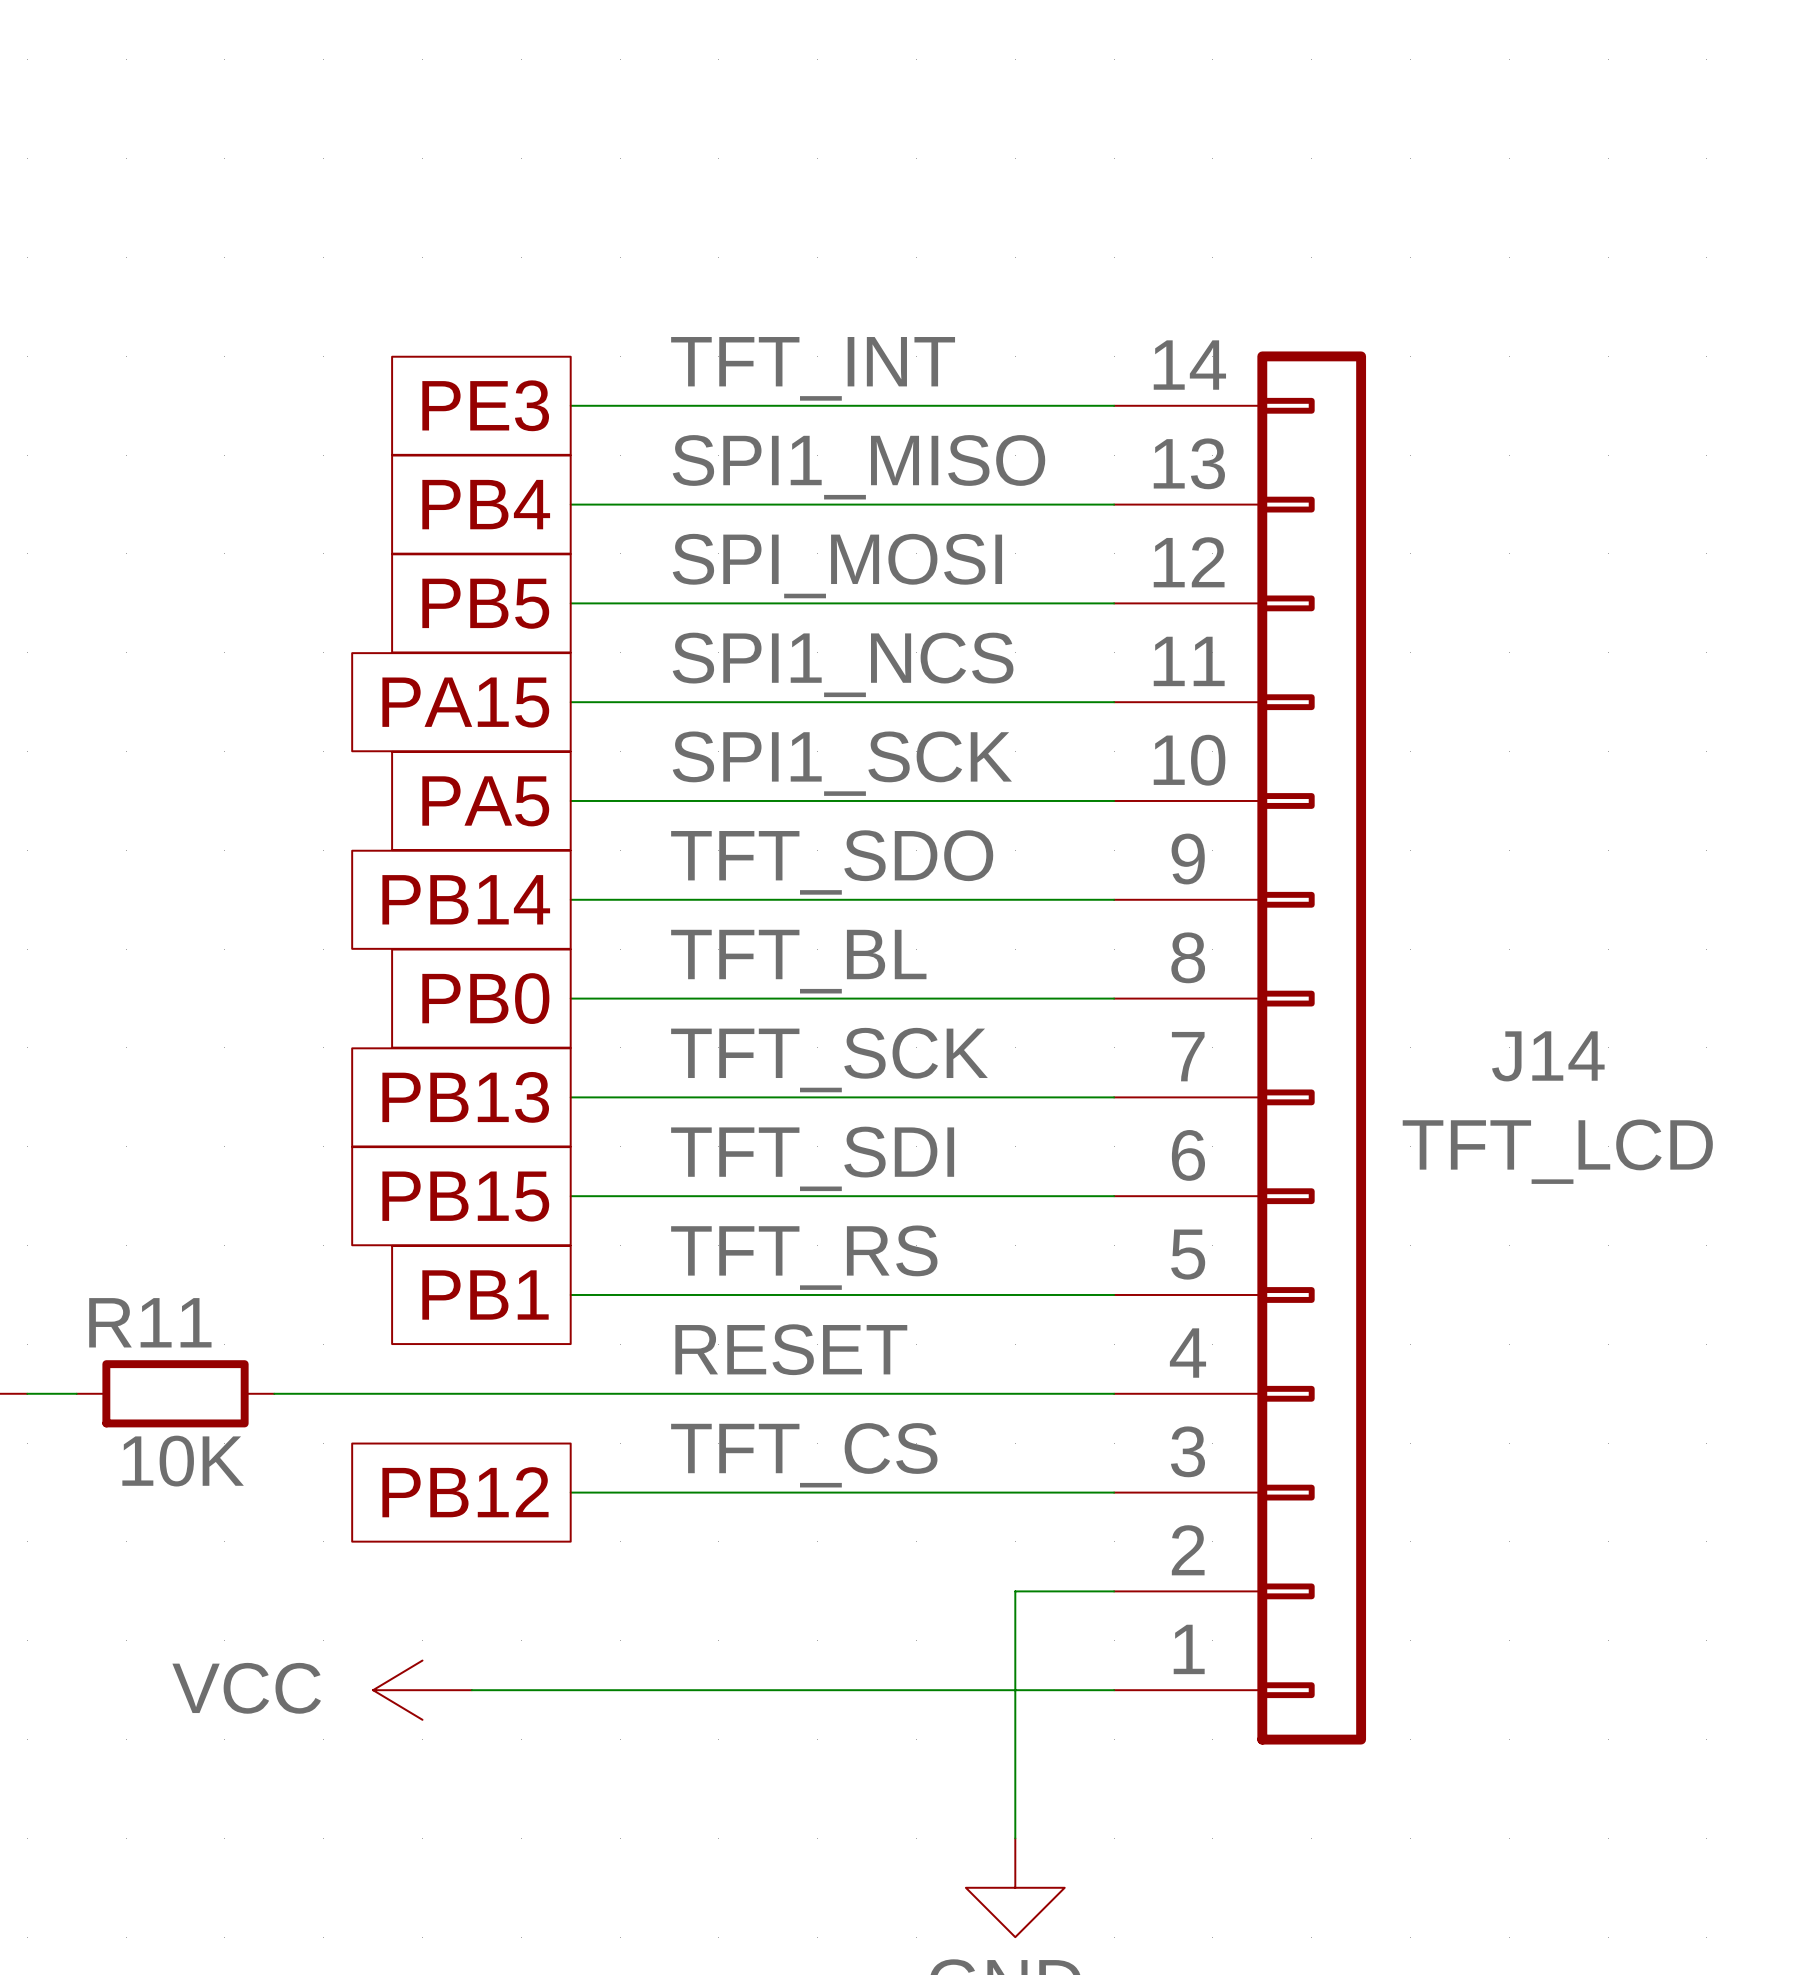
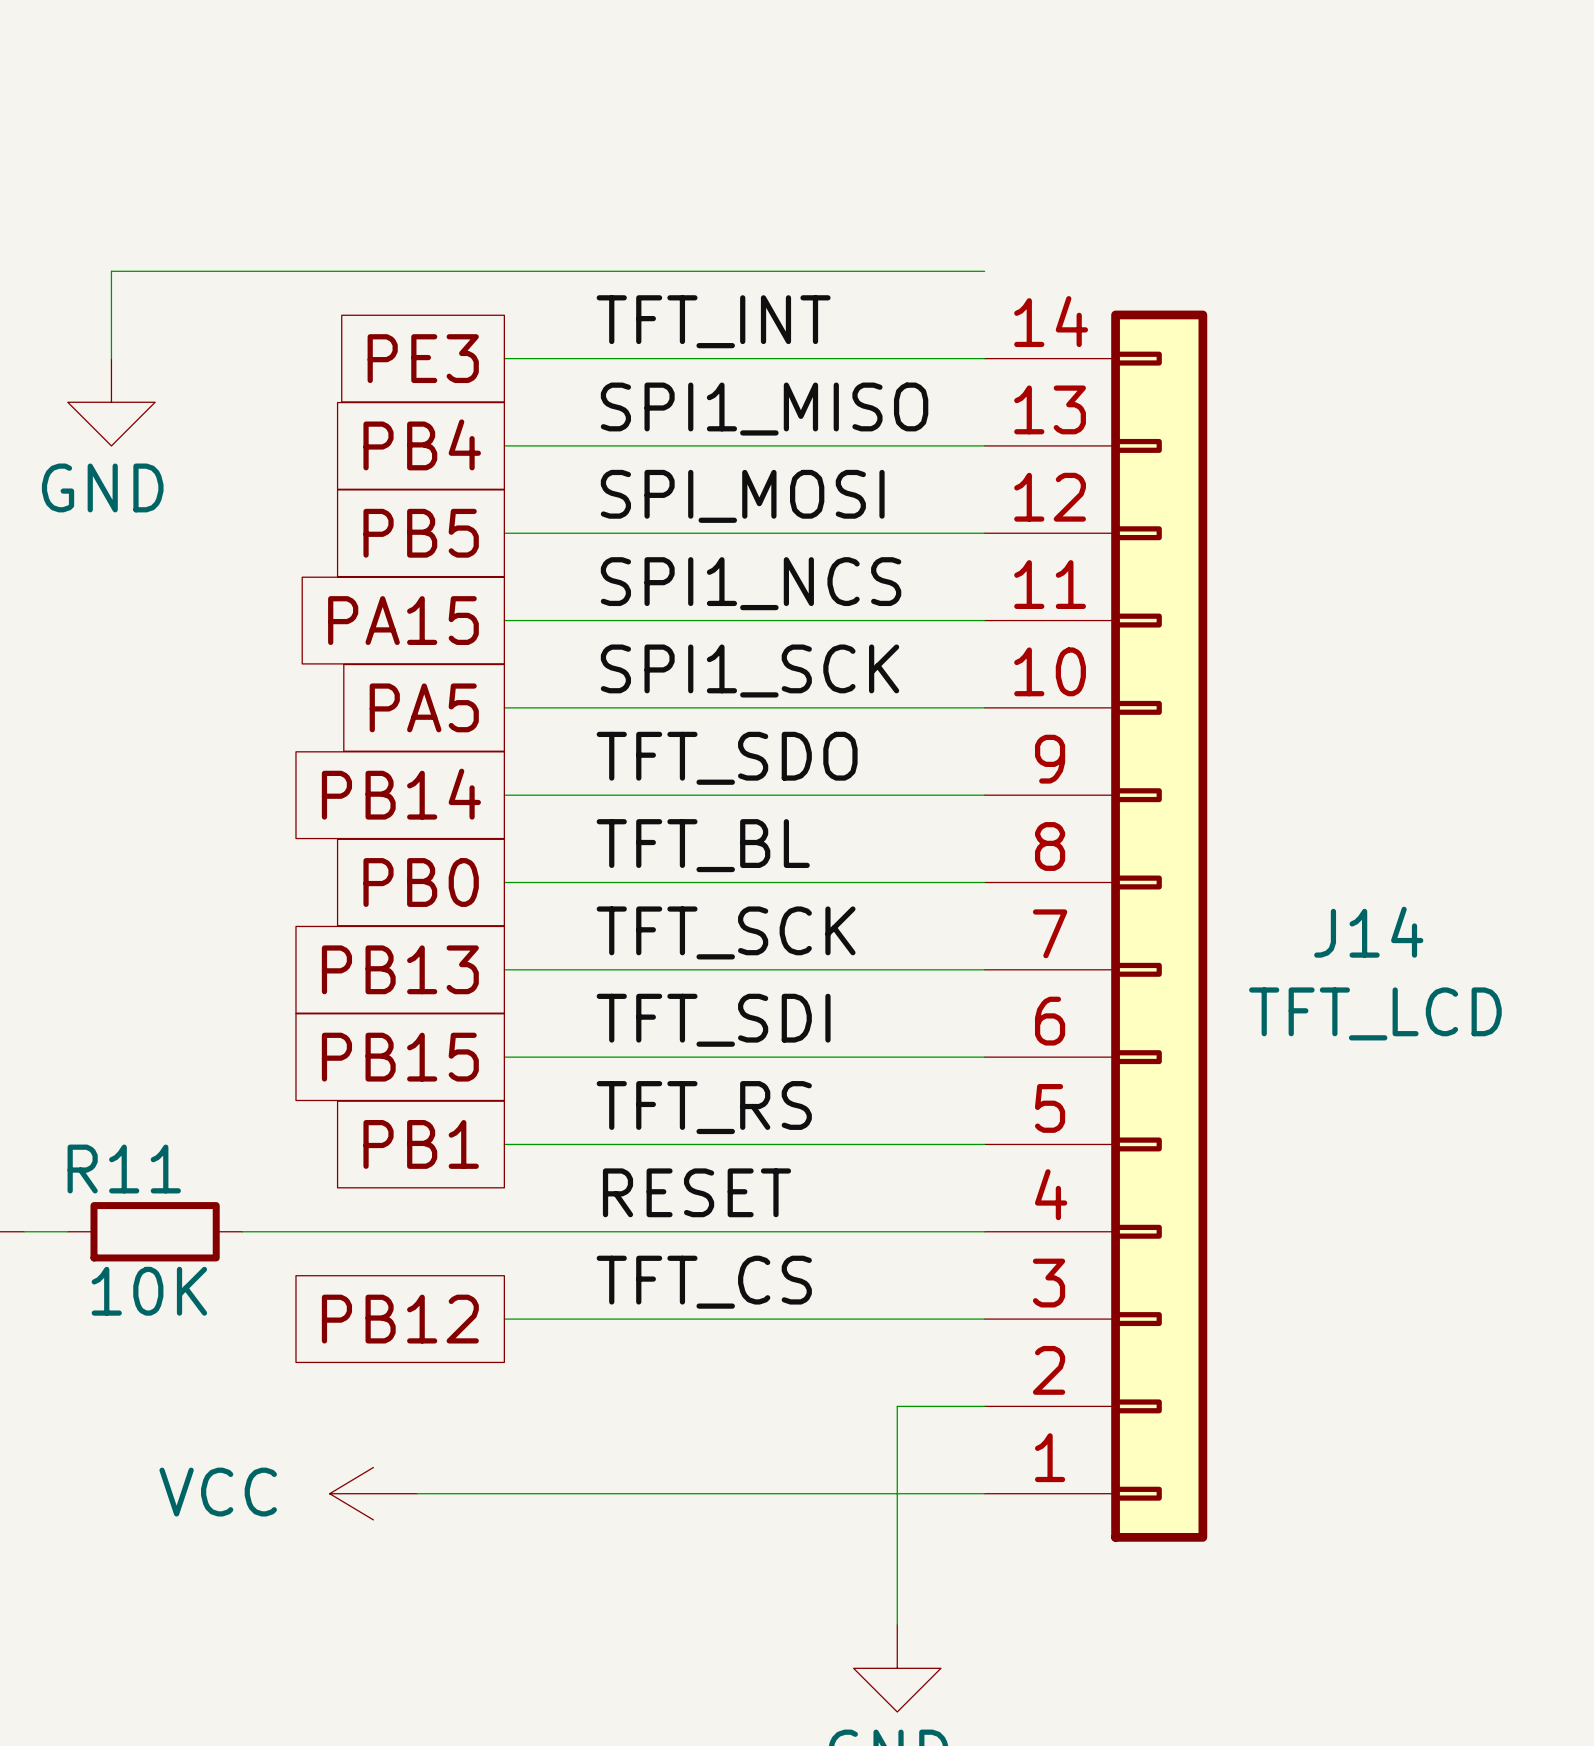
wire: none -> (984, 271) (111, 271) (111, 358)
power symbol: none -> GND (111, 402)

